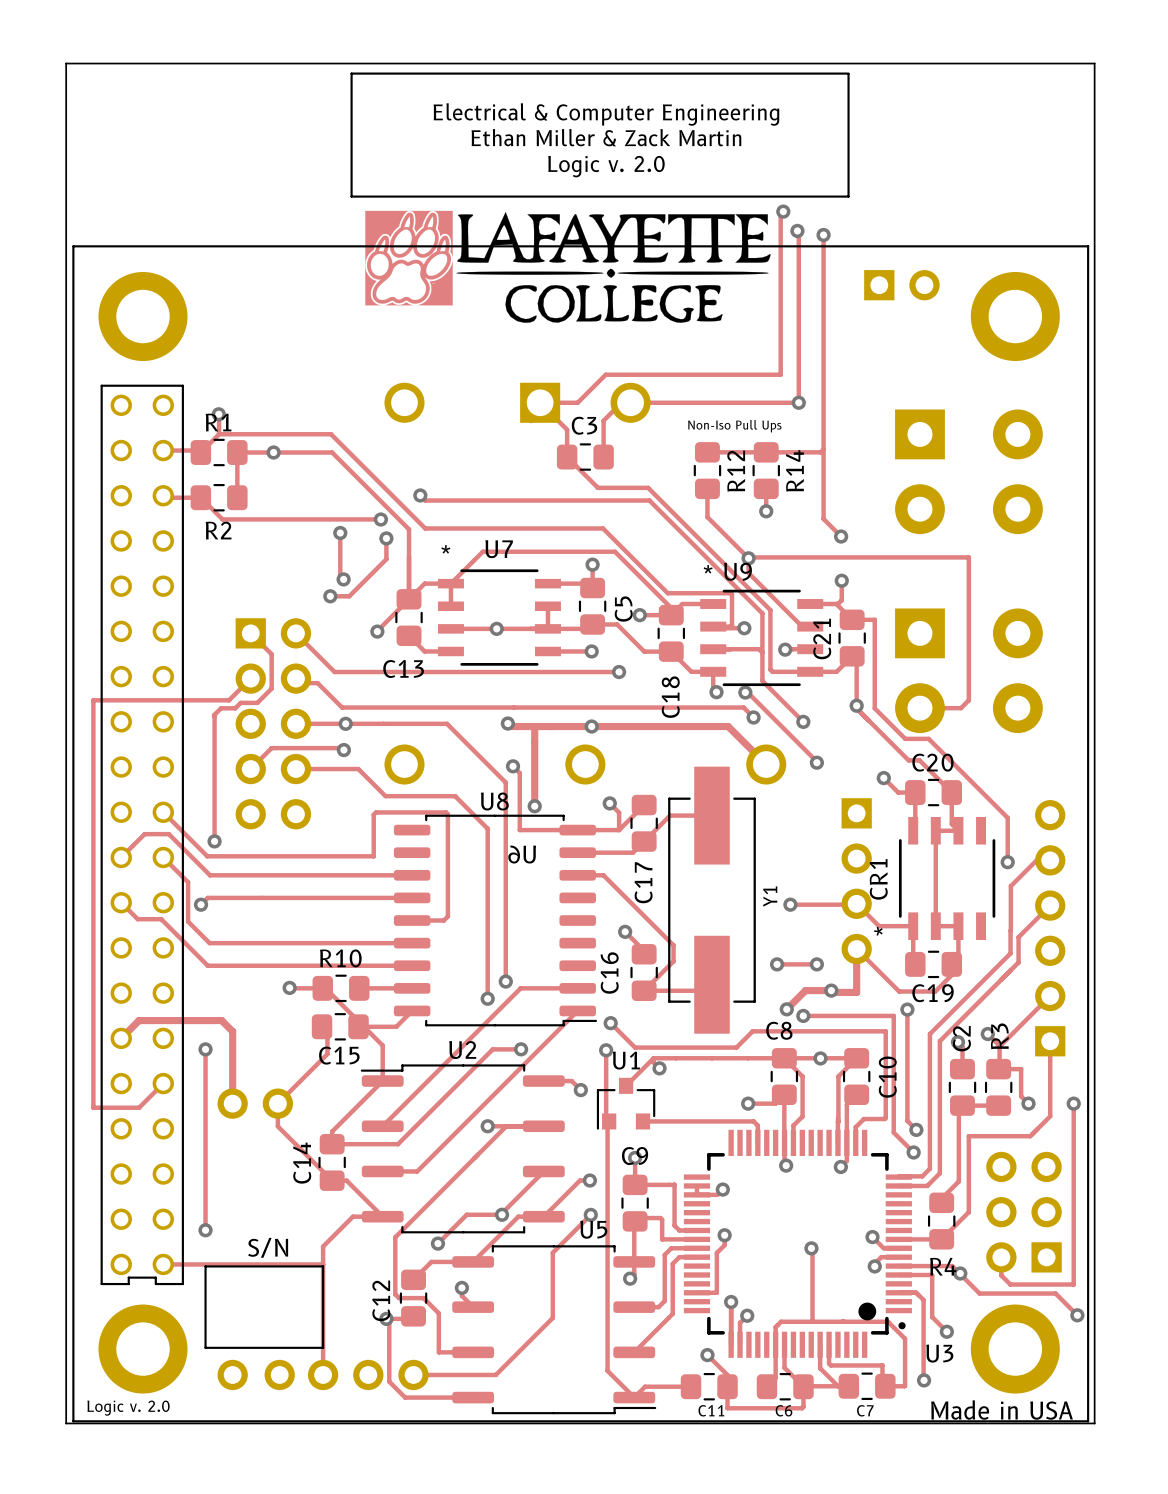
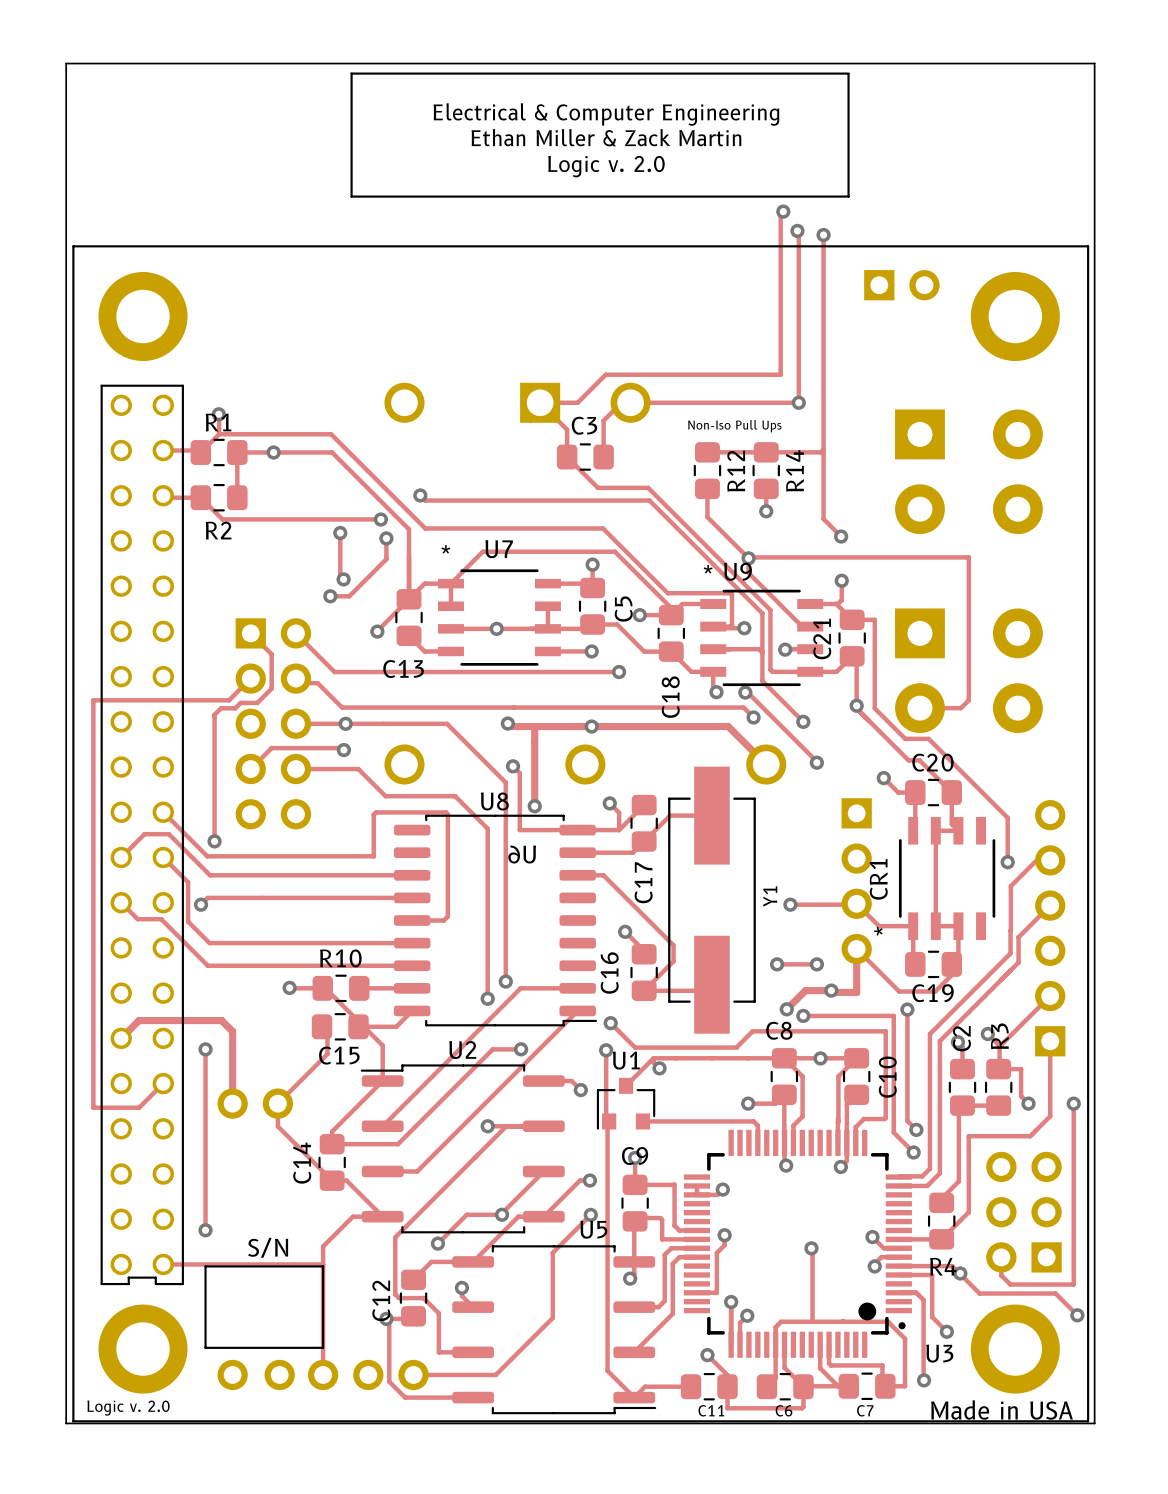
drawing: [365, 210, 771, 323] -> none

